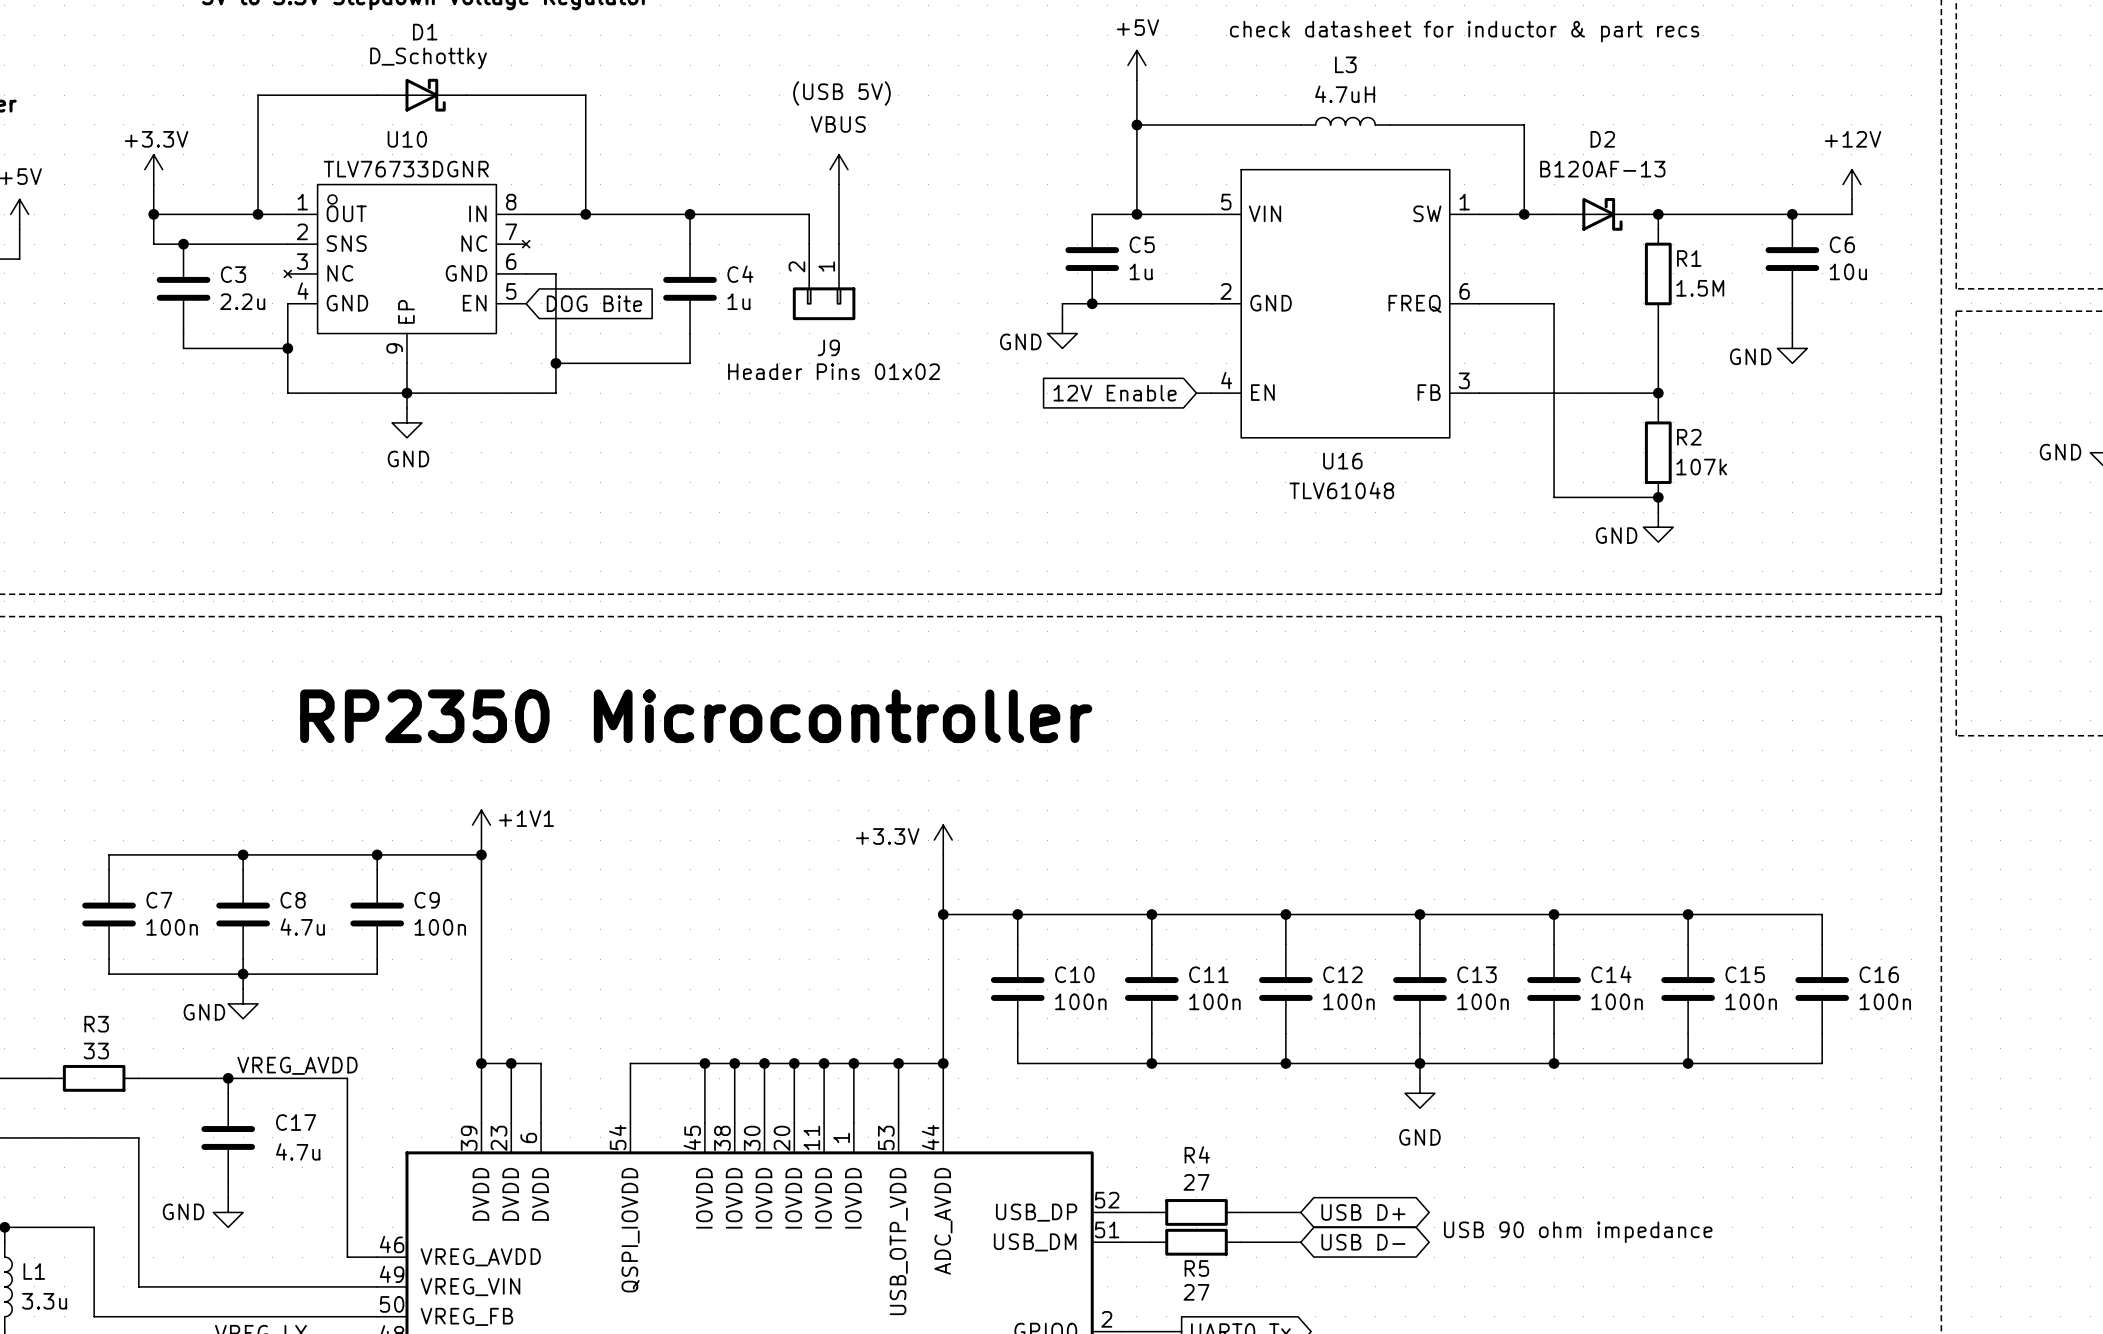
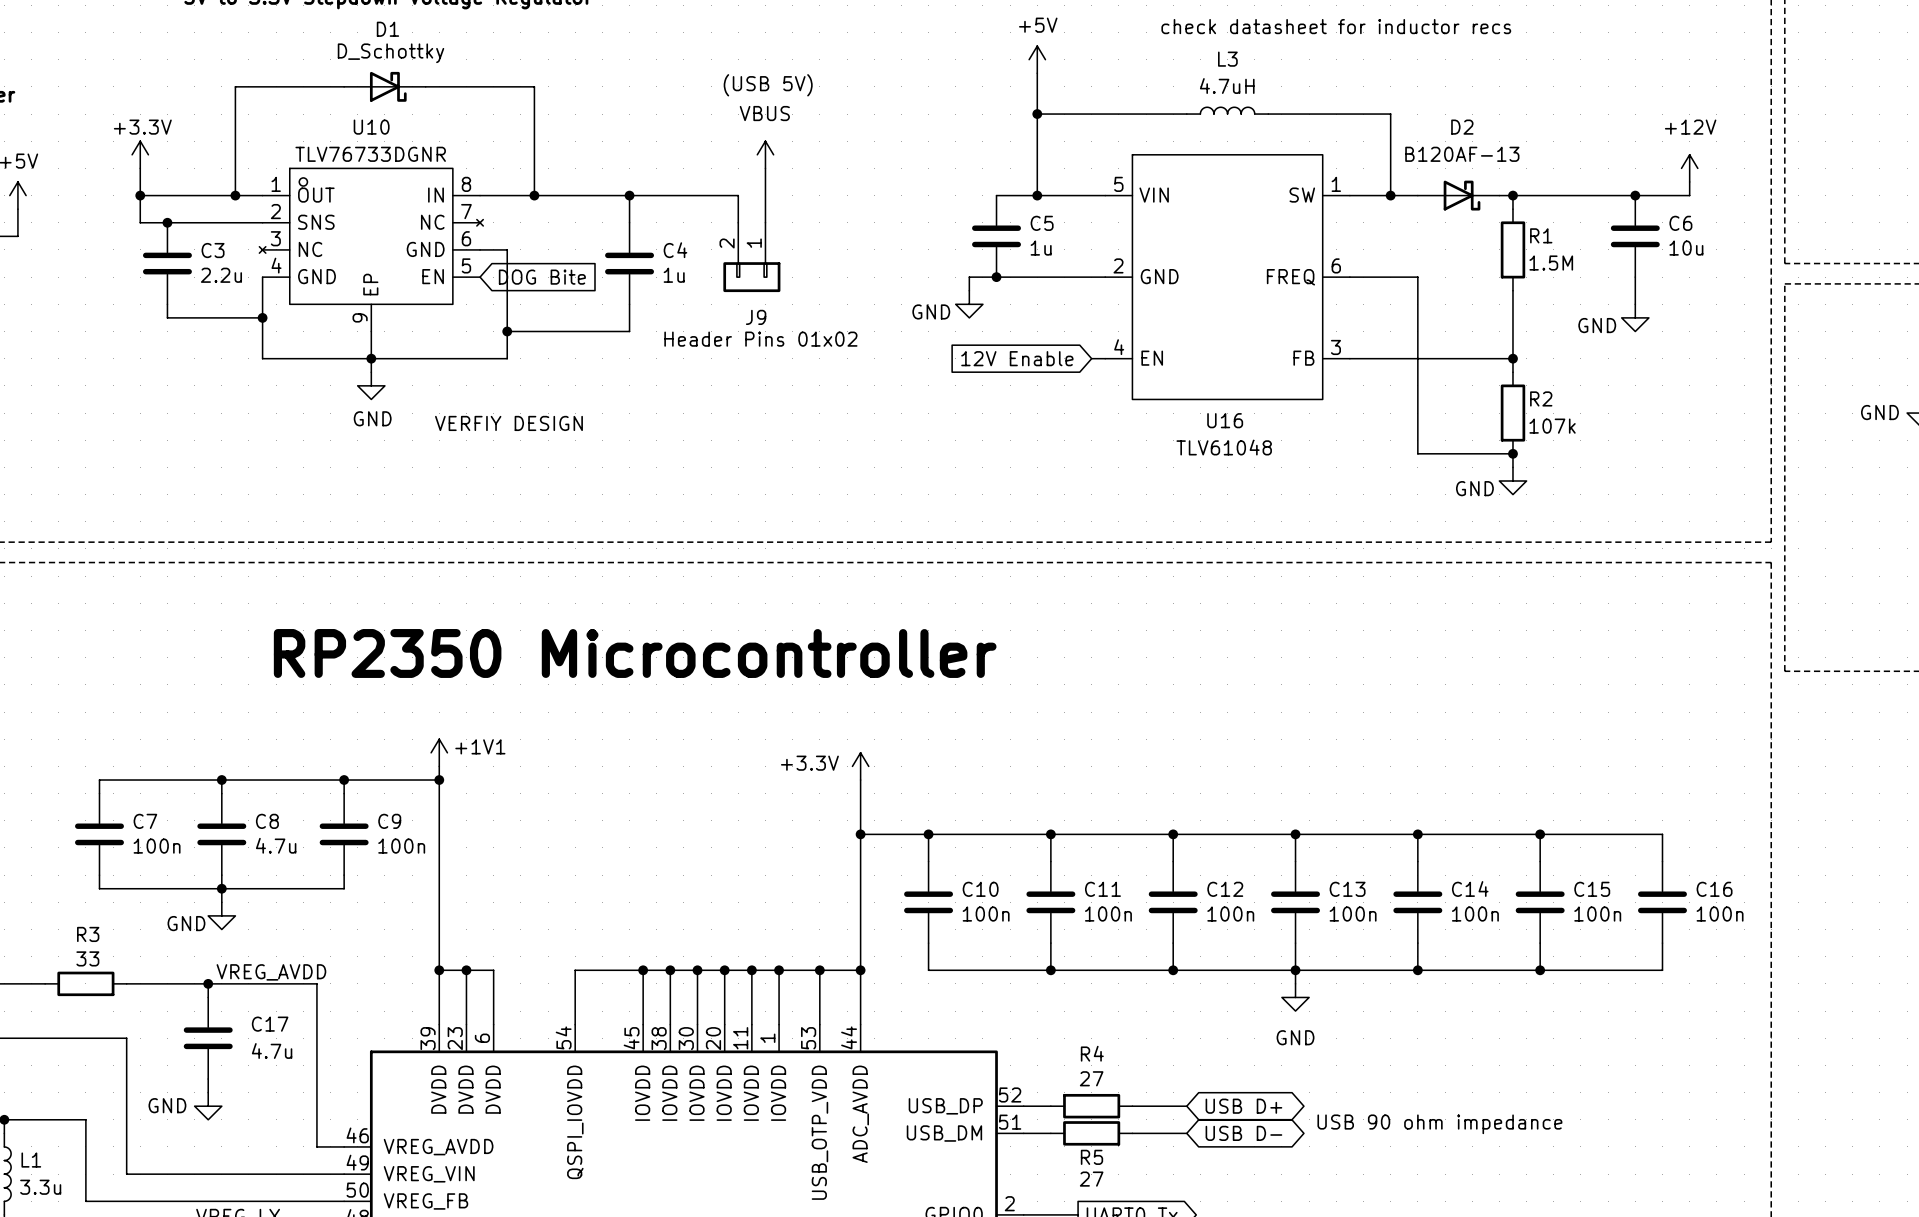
text: check datasheet for inductor & part recs (1464, 31) -> check datasheet for inductor recs (1336, 26)
text: none -> VERFIY DESIGN (508, 423)

